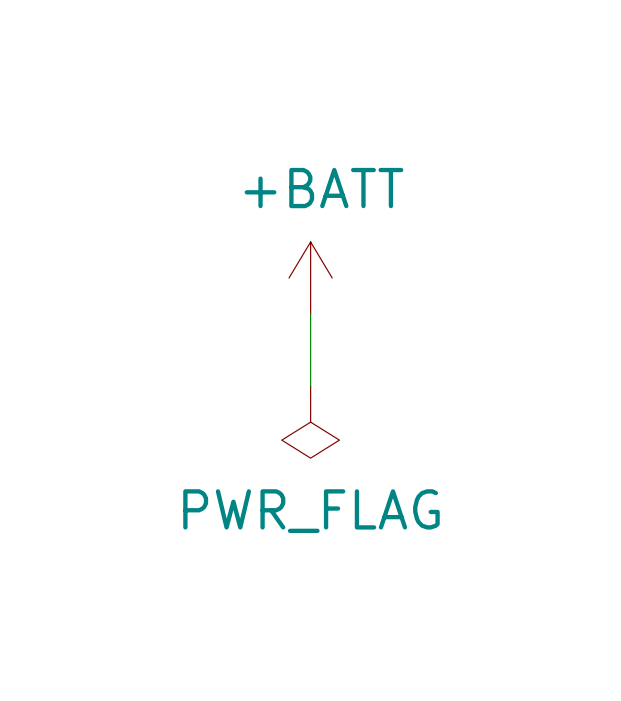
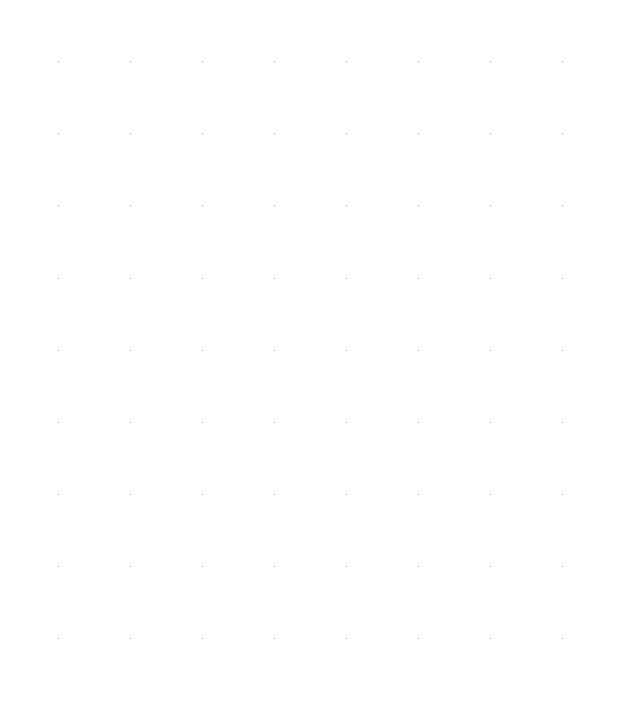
power symbol: +BATT (310, 278) -> none
wire: (310, 314) (310, 386) -> none
power symbol: PWR_FLAG (310, 422) -> none

